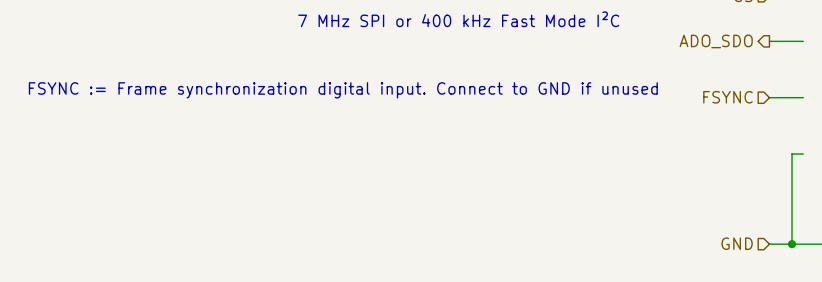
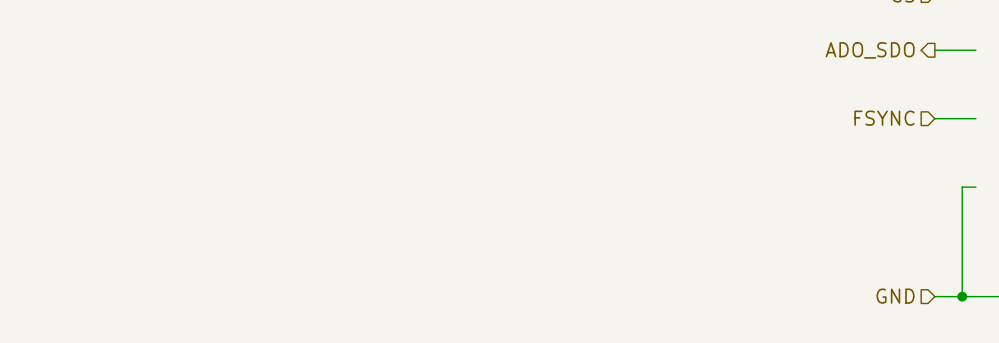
text: 7 MHz SPI or 400 kHz Fast Mode I²C (458, 19) -> none
text: FSYNC := Frame synchronization digital input. Connect to GND if unused (343, 90) -> none

